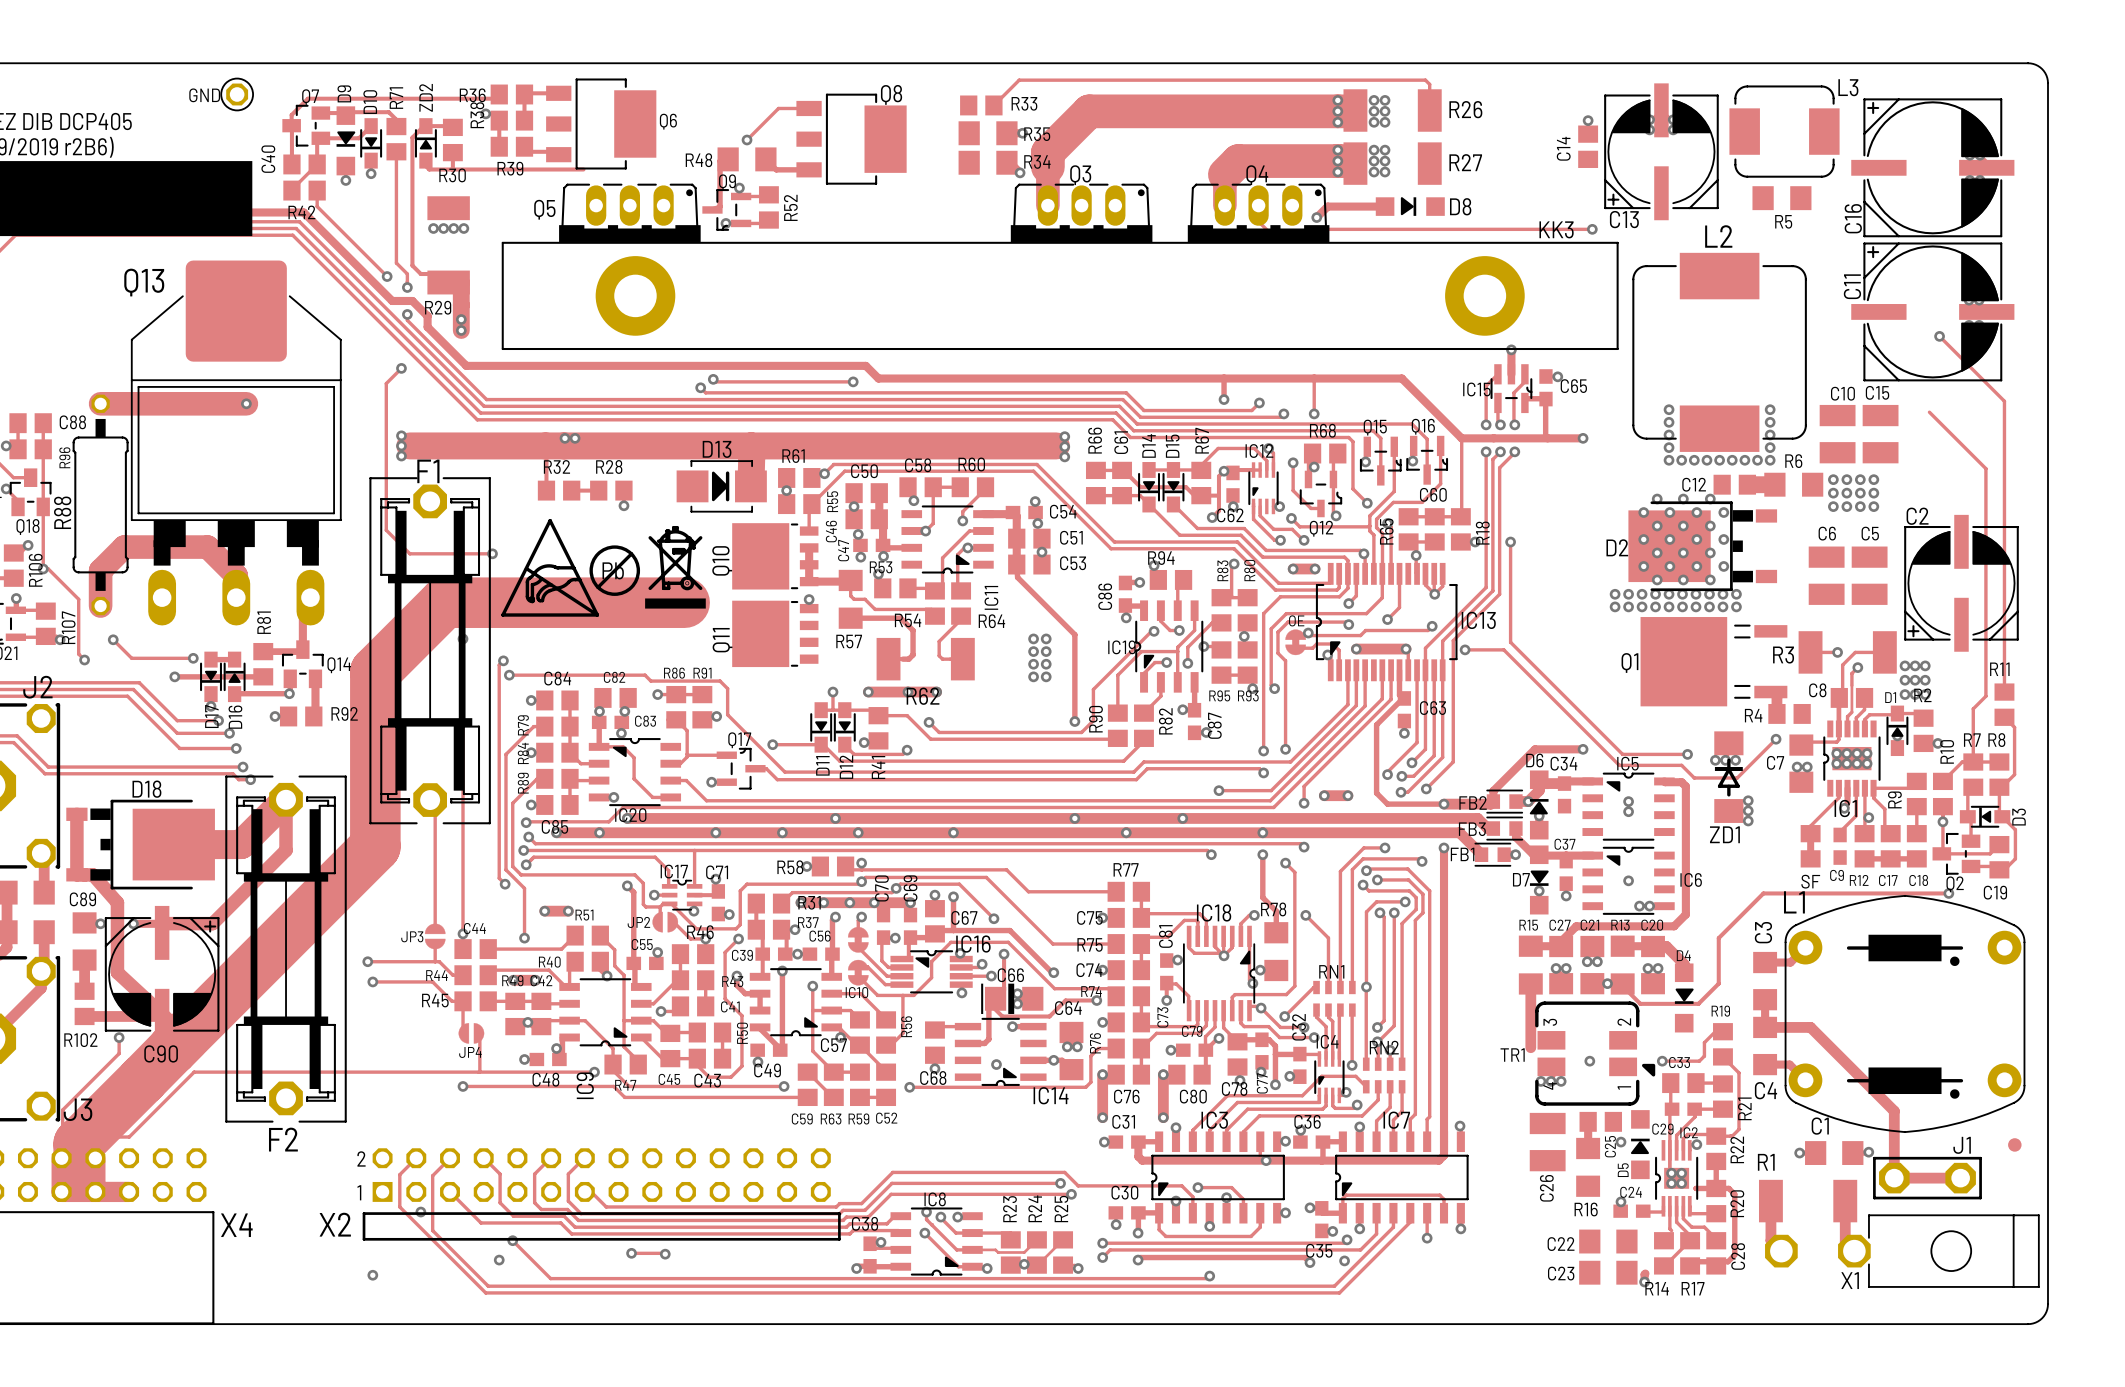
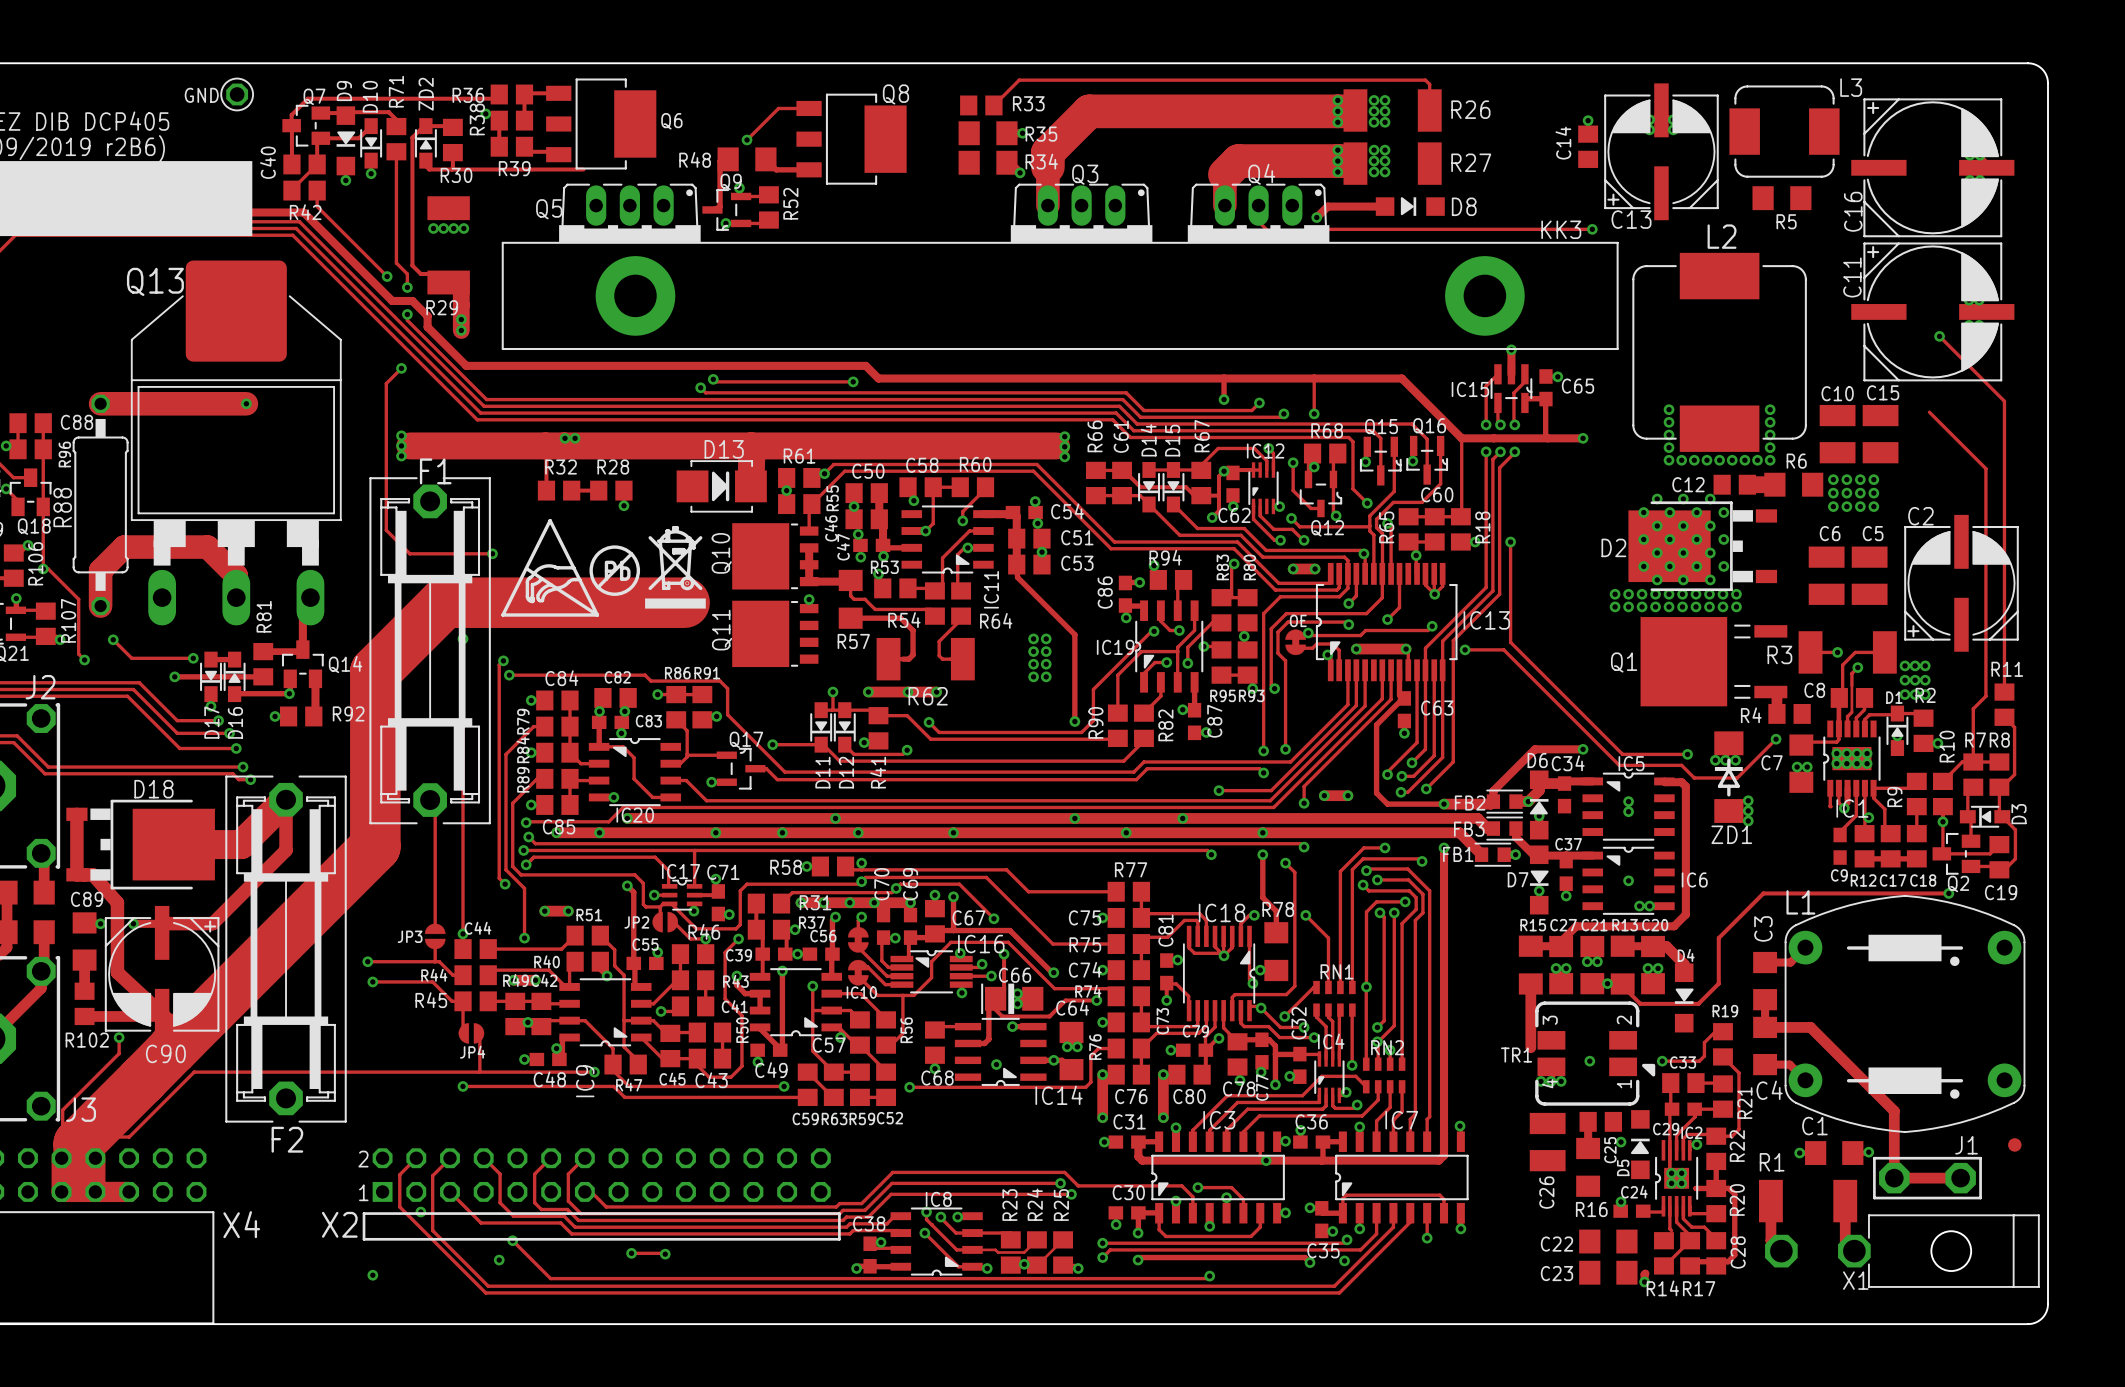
track: none -> (1830, 788) (1830, 806)
track: (1838, 797) (1810, 826) (1810, 833) -> (1838, 797) (1838, 802) (1844, 808)
SF: (1810, 846) -> none

